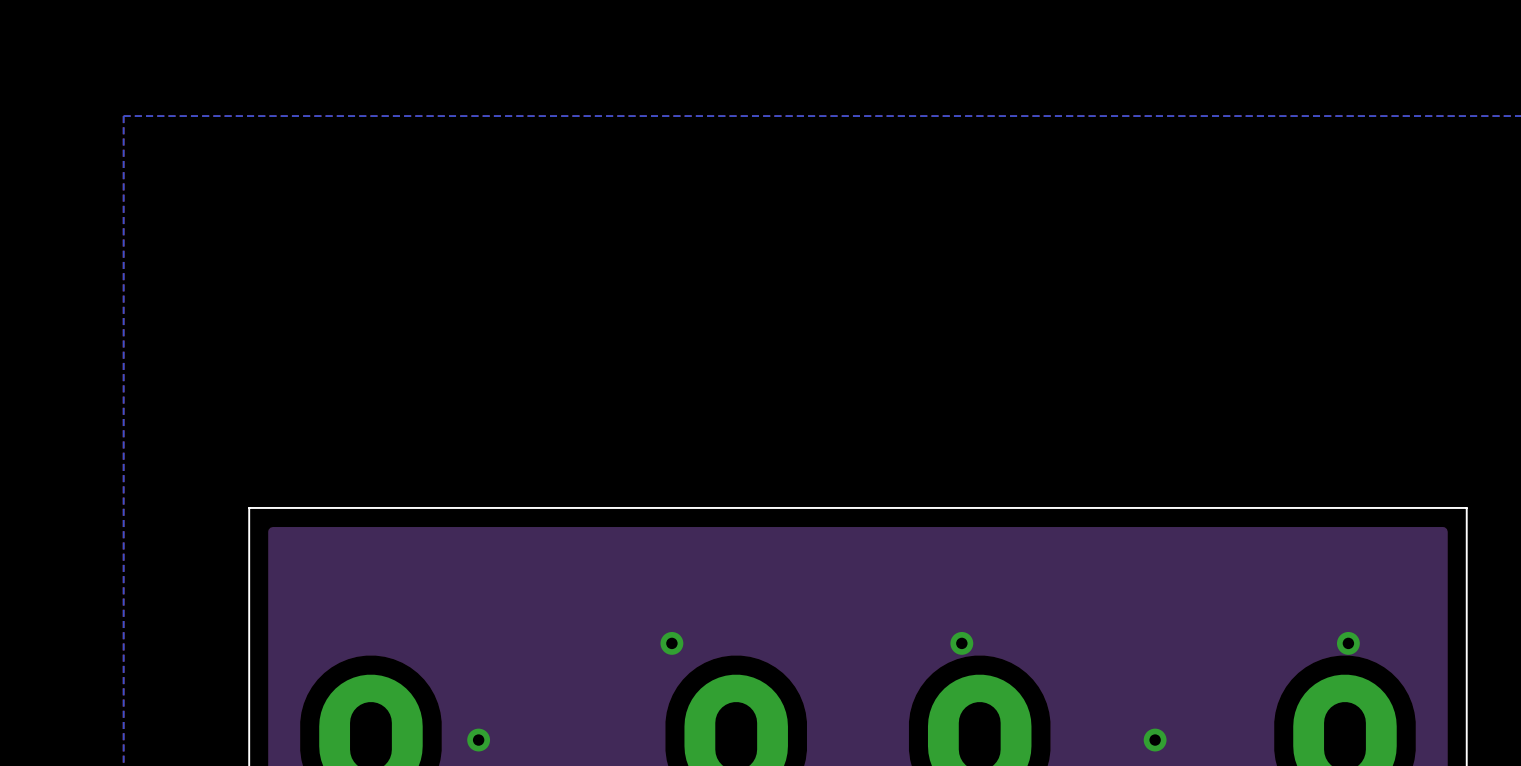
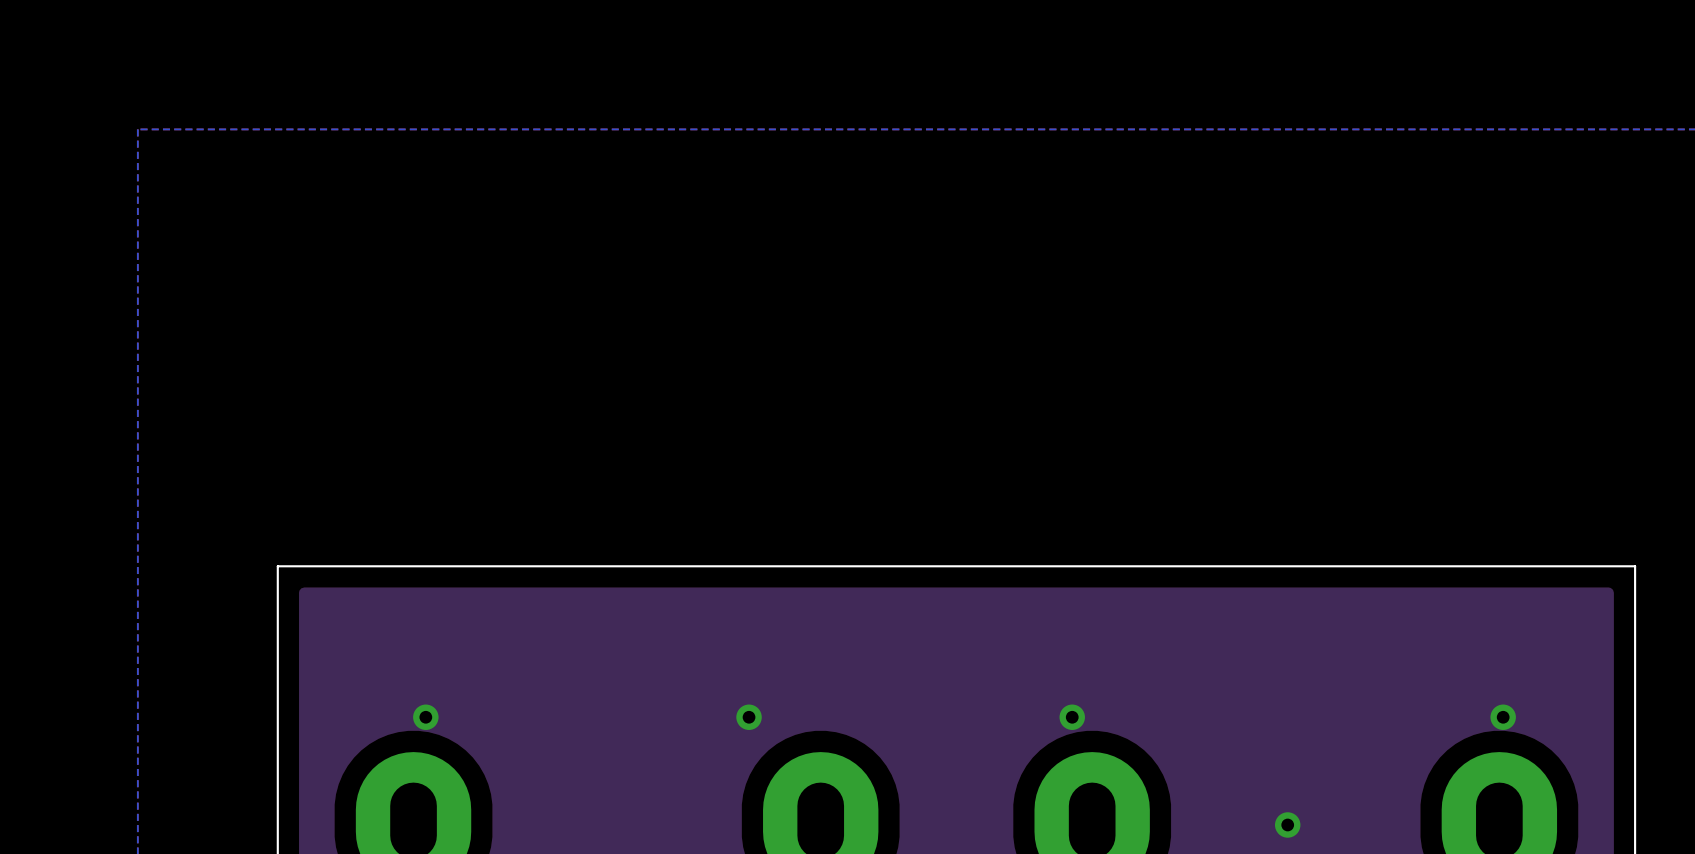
via position: (478, 740) -> (425, 717)

